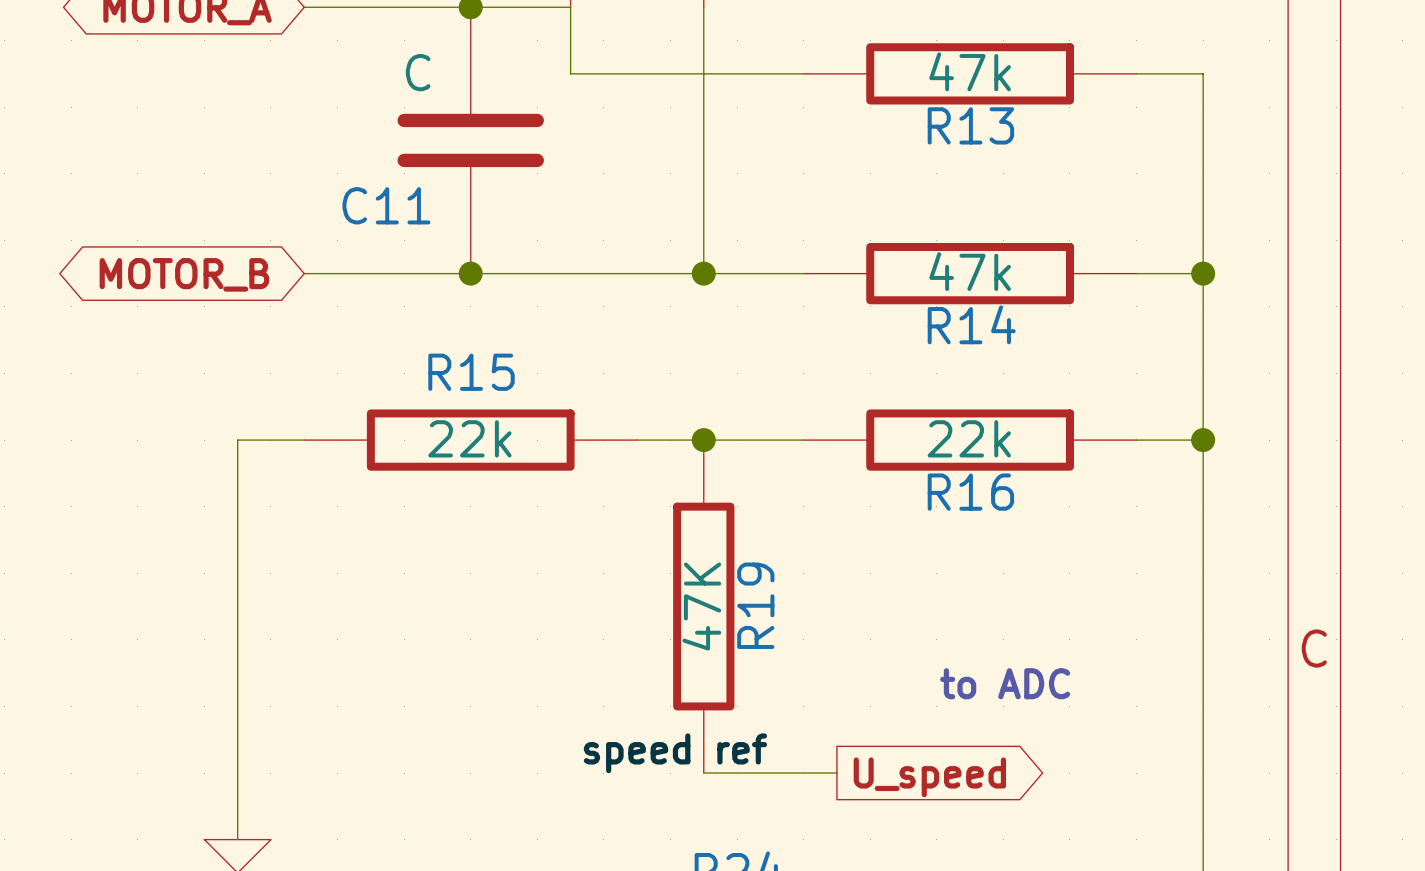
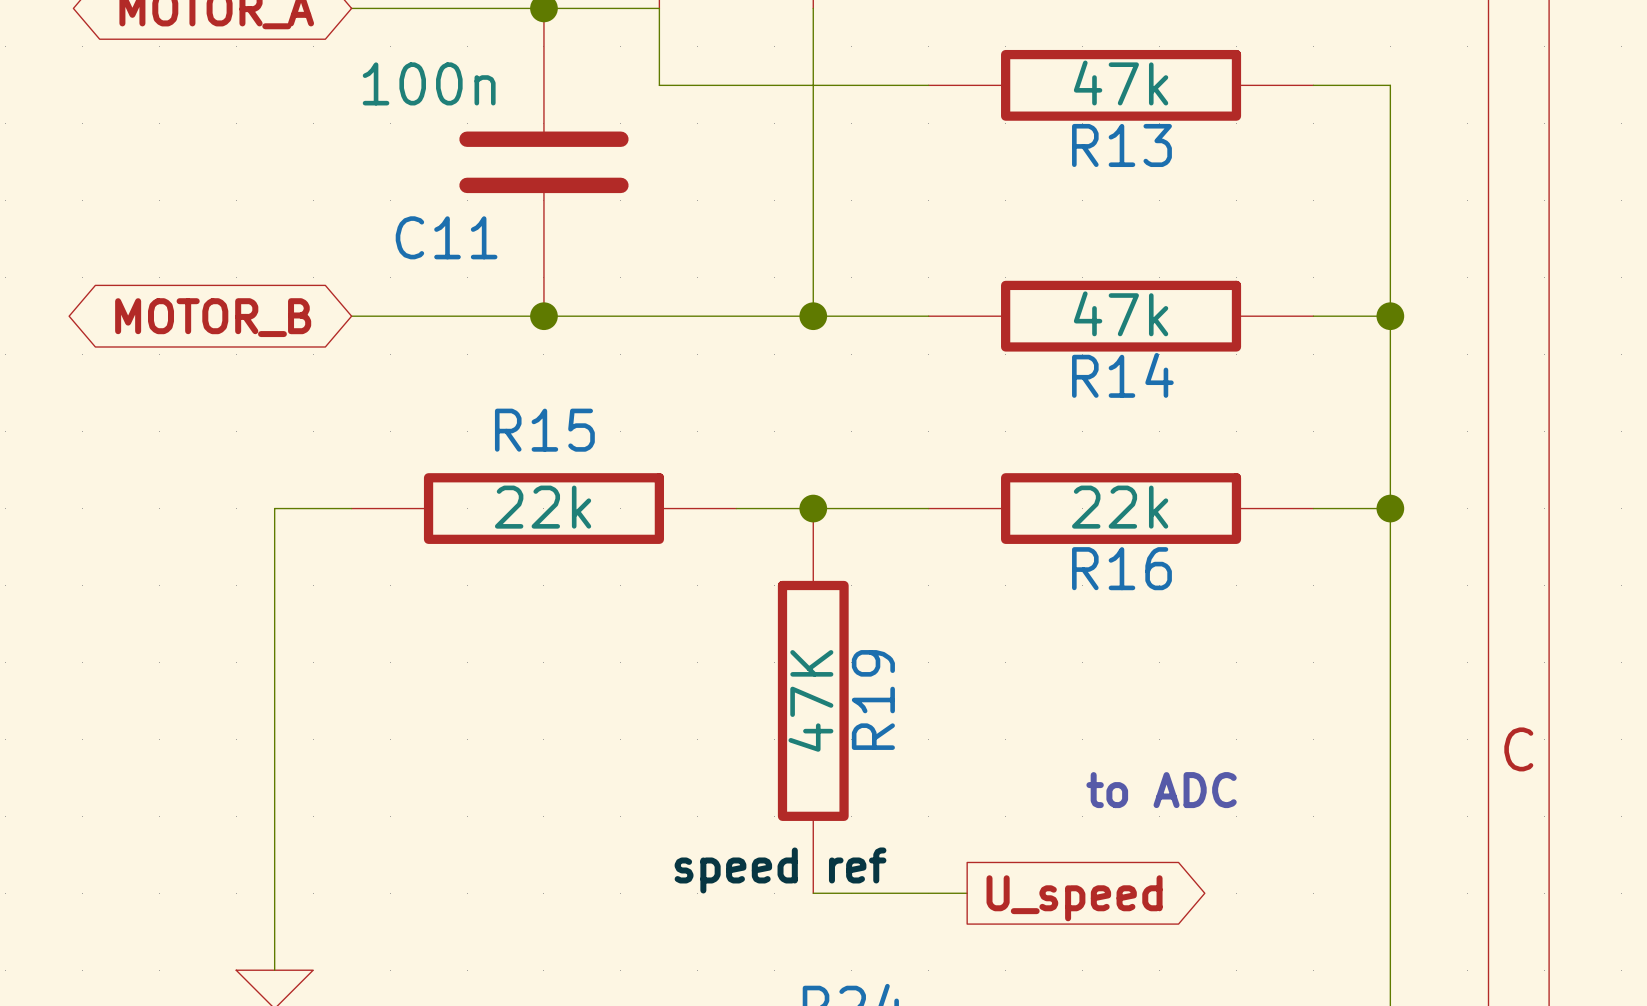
C11 value: C (418, 72) -> 100n (429, 83)

